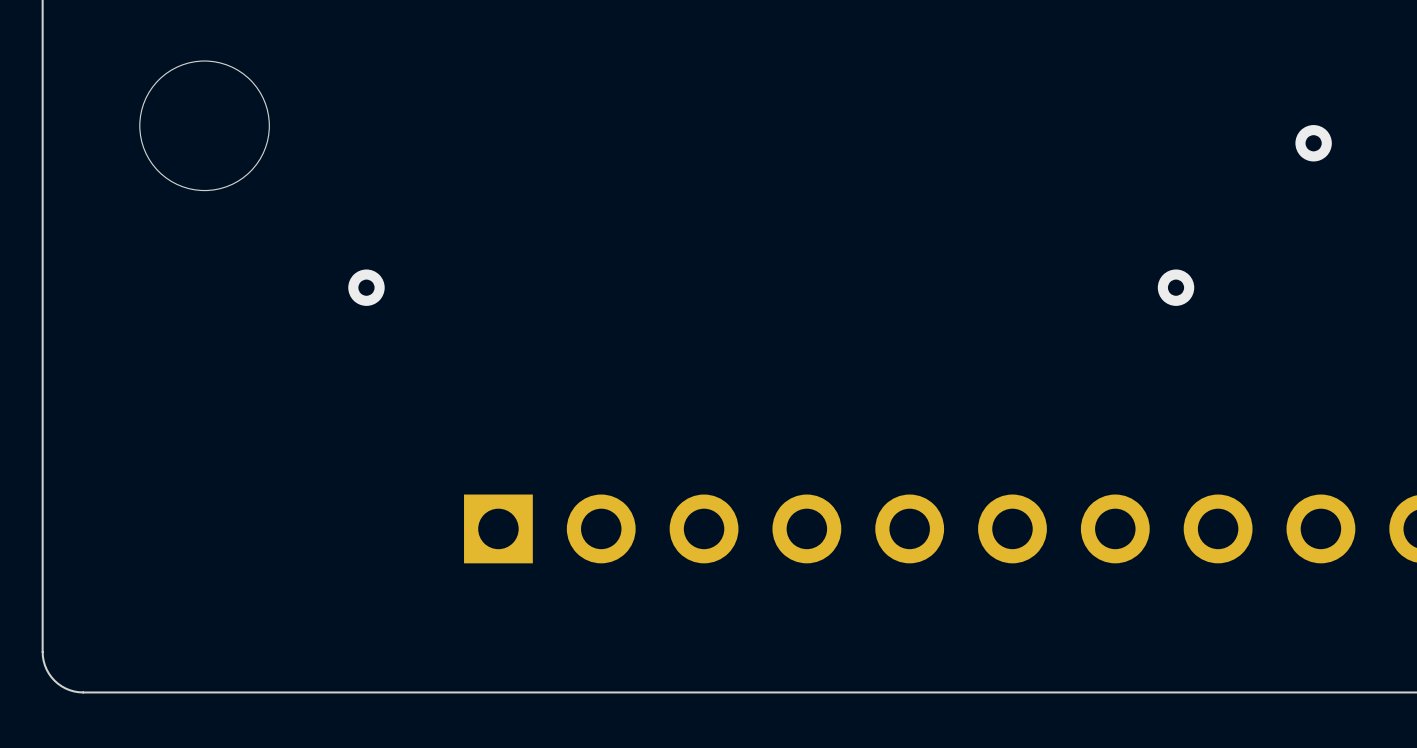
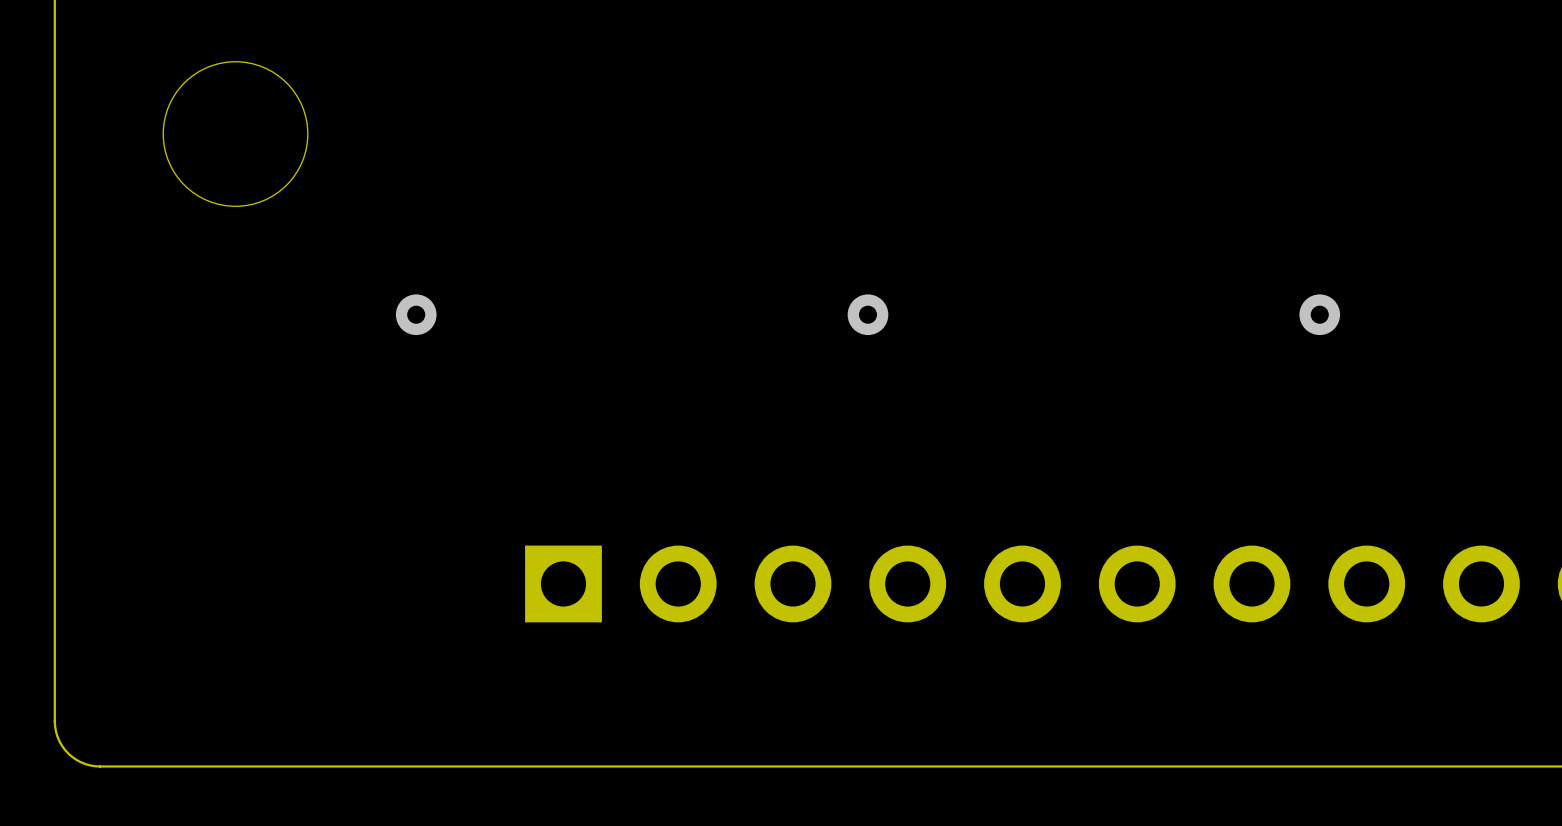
via: (1313, 143) -> none
via: none -> (867, 314)

